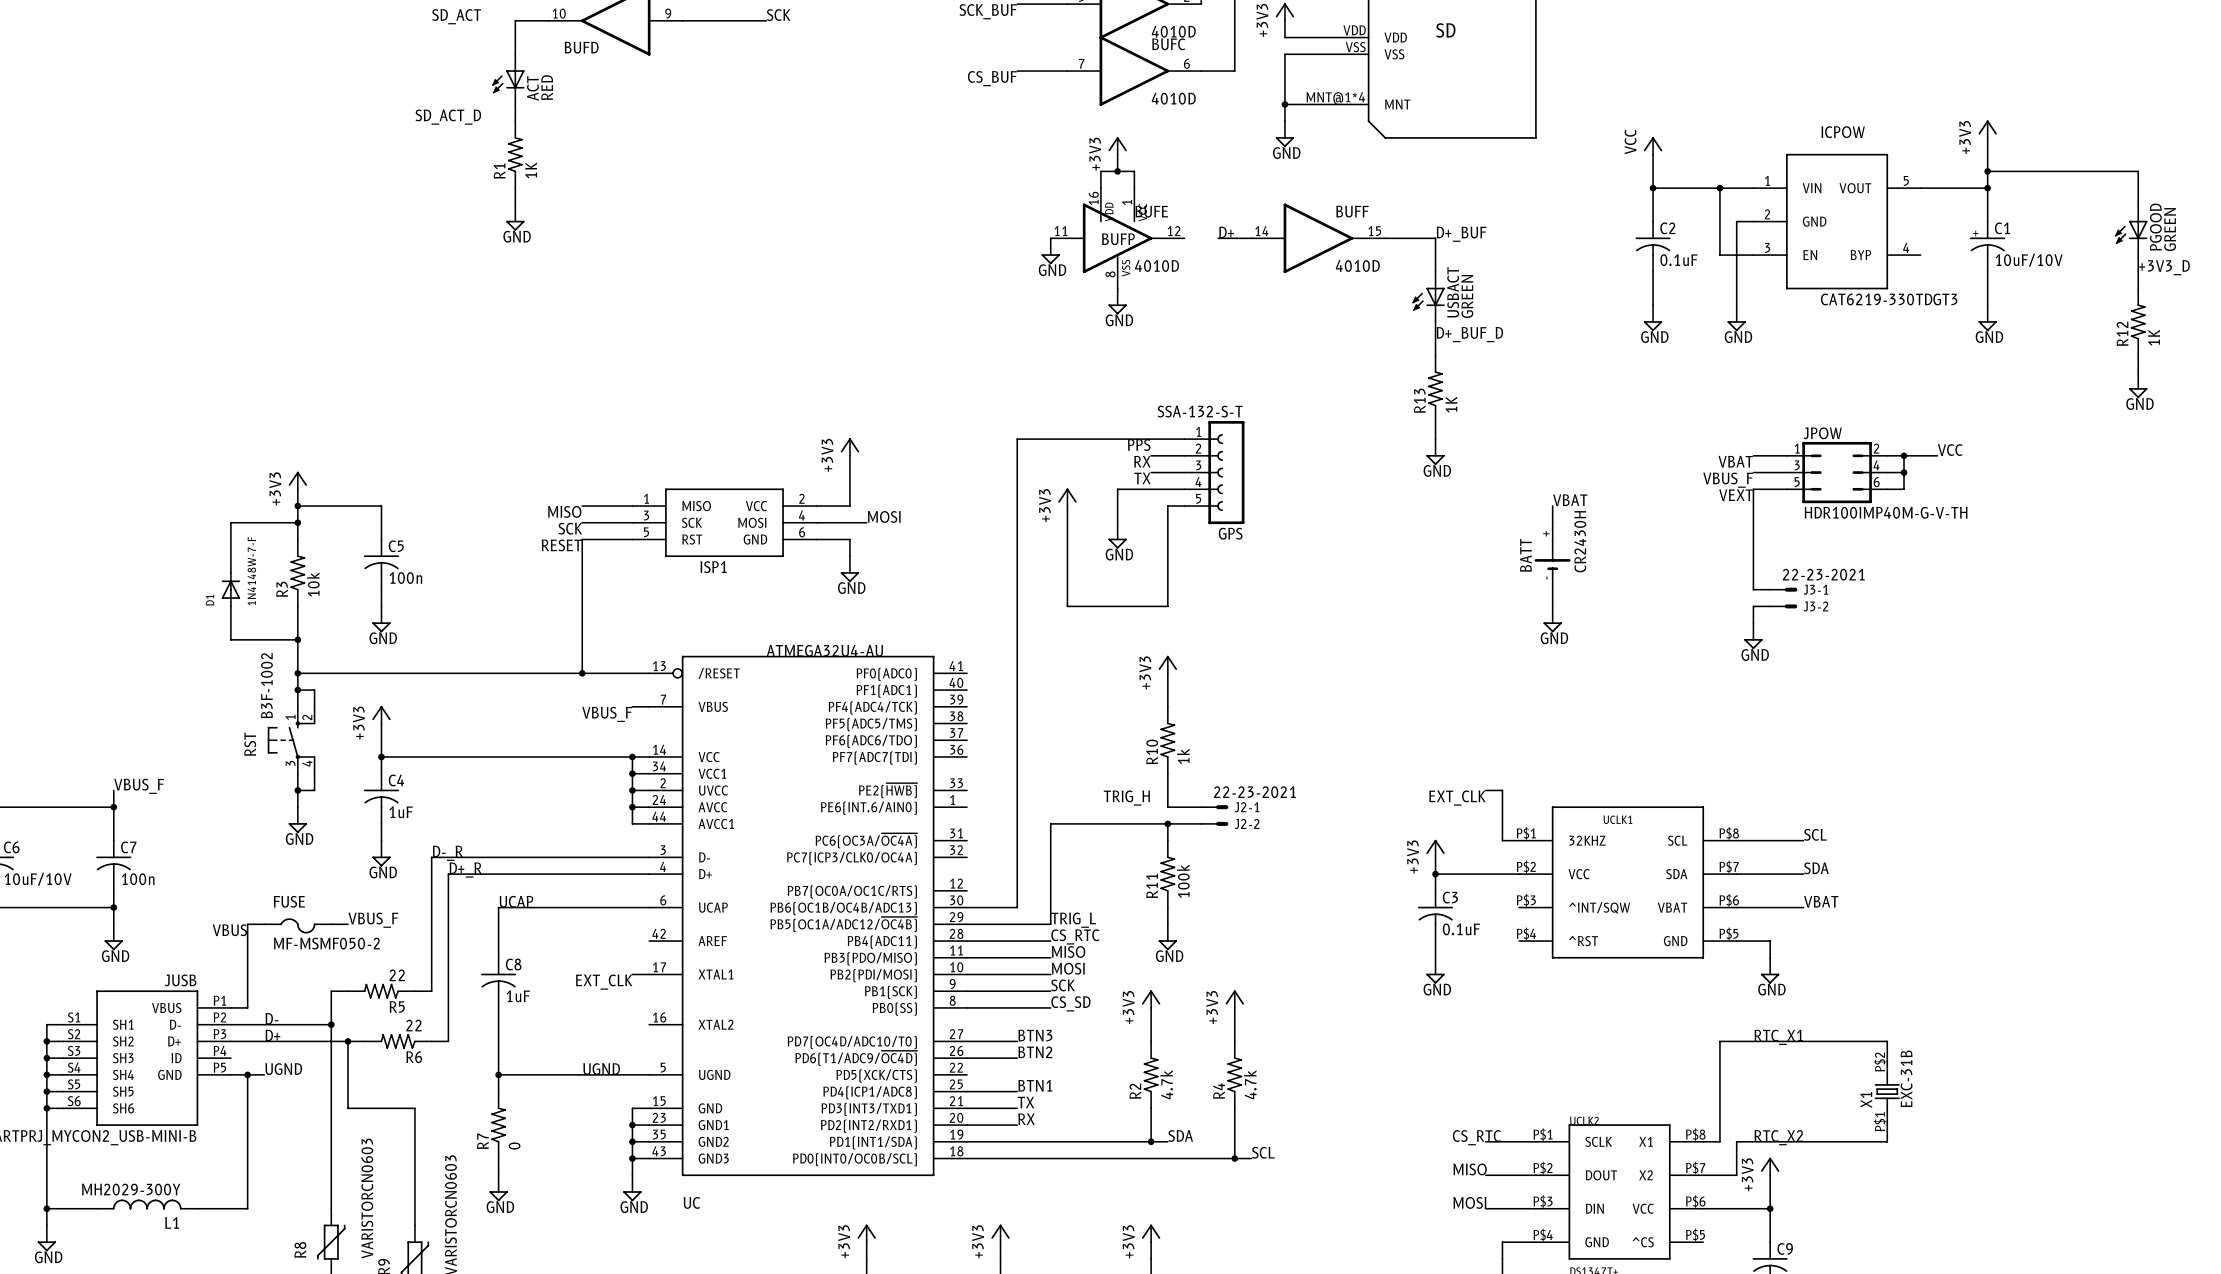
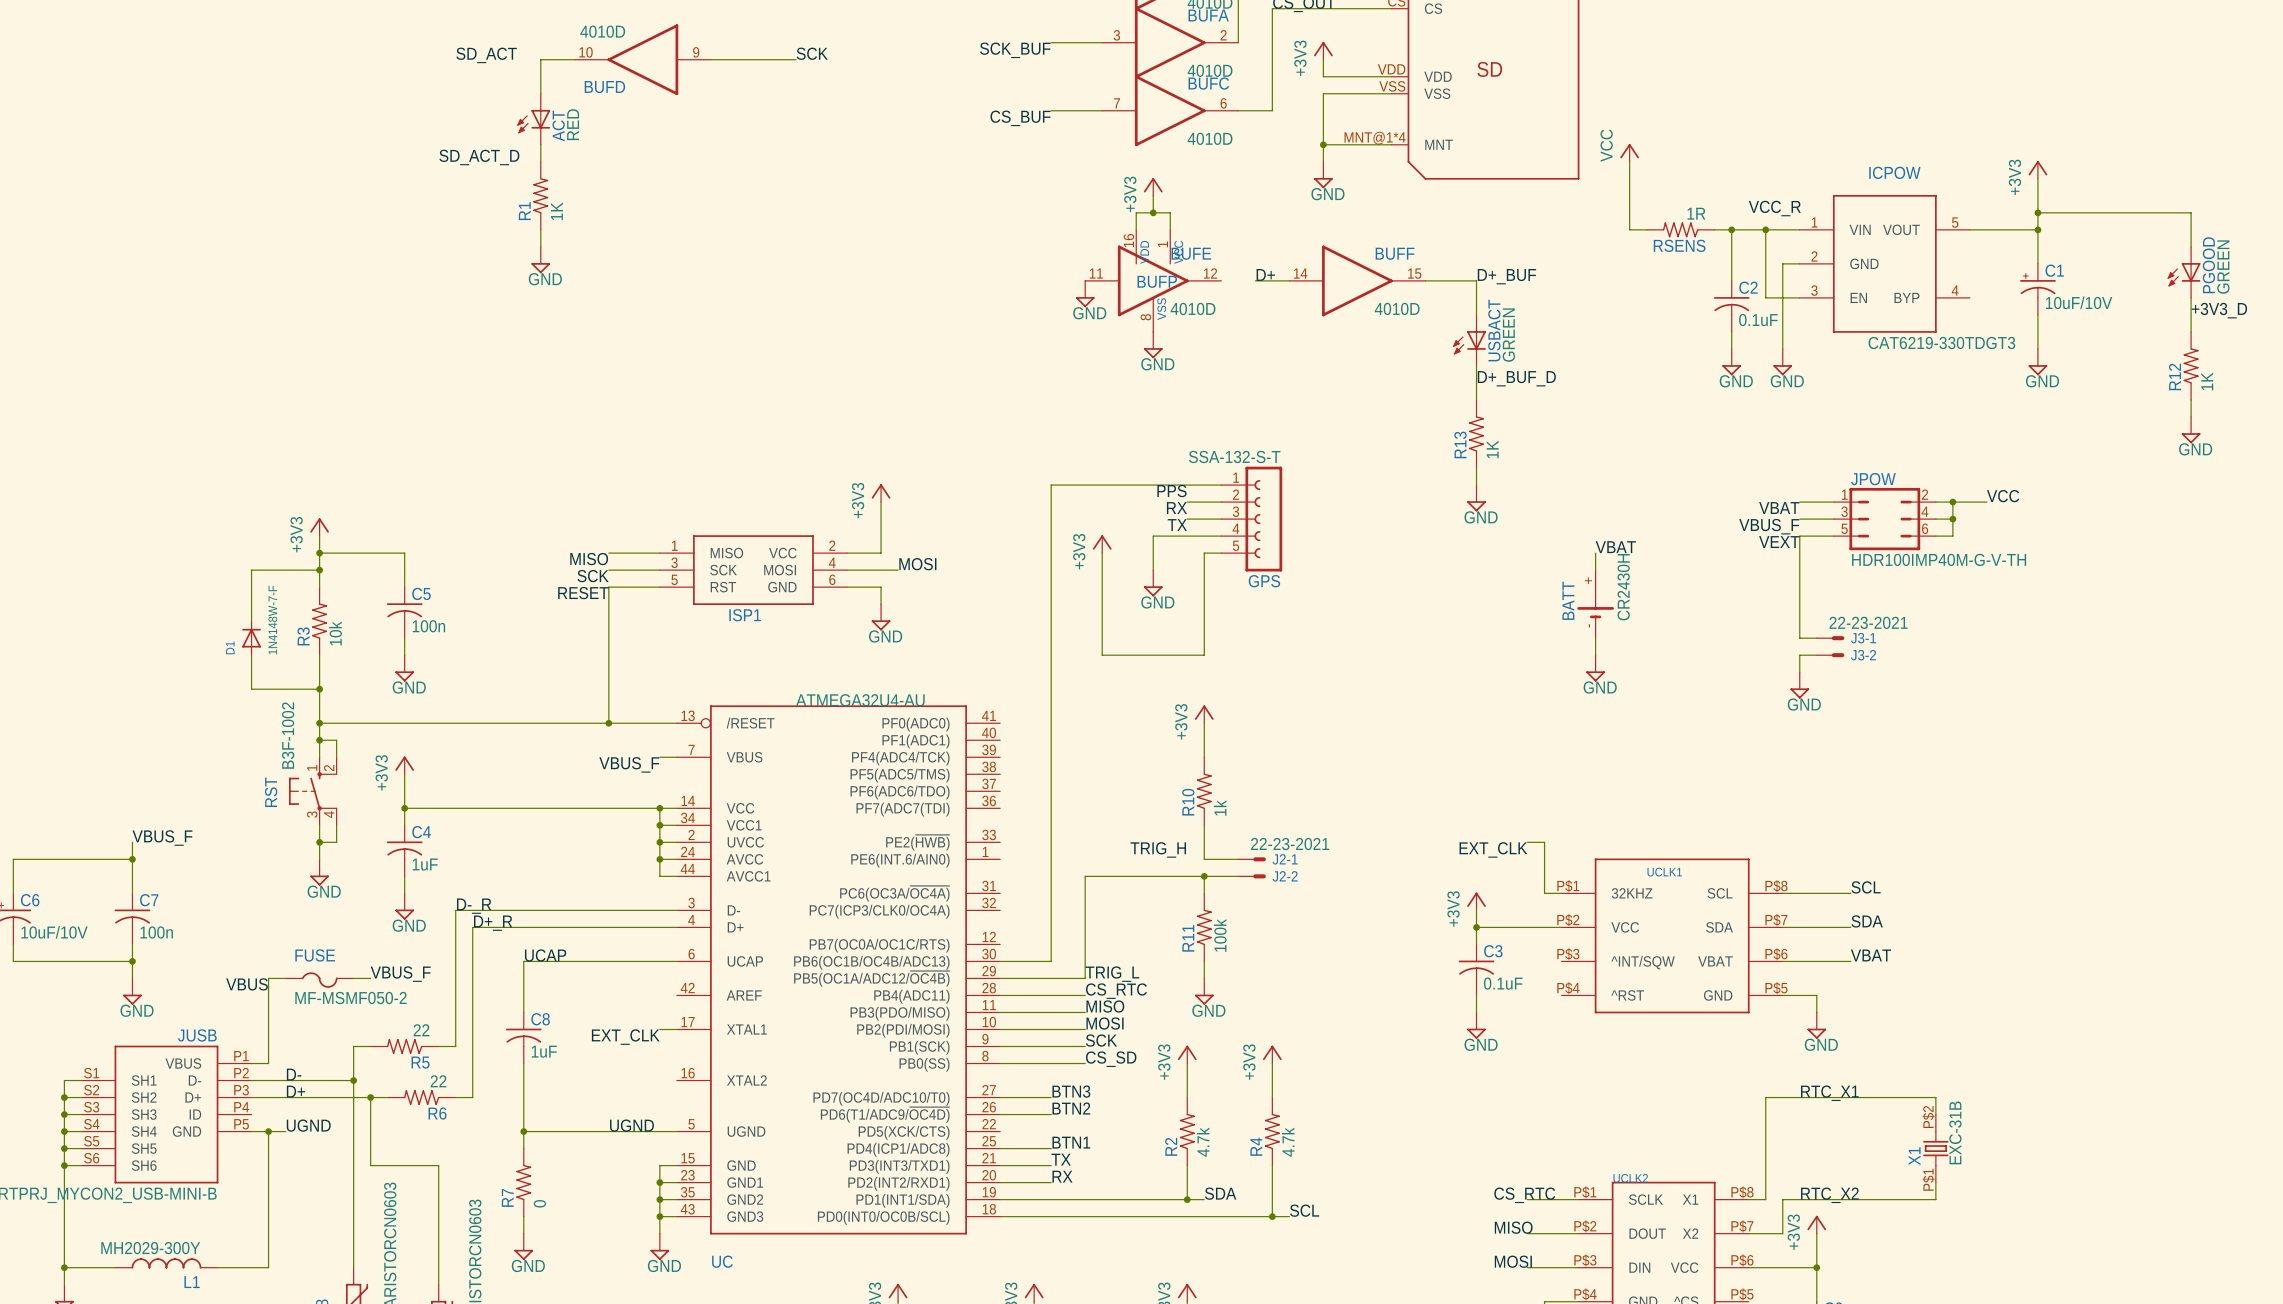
wire: none -> (1629, 161) (1629, 229) (1646, 229)
power symbol position: VCC (1653, 145) -> VCC (1629, 152)
wire: (1653, 154) (1653, 221) -> none
label: none -> VCC_R (1774, 208)
RSENS: none -> 1R (1680, 229)
junction position: (1653, 188) -> (1731, 229)
wire: none -> (1731, 229) (1731, 280)
C2 position: (1653, 246) -> (1731, 306)
wire: (1653, 271) (1653, 305) -> none
wire: none -> (1731, 331) (1731, 348)
power symbol position: GND (1653, 318) -> GND (1731, 362)

